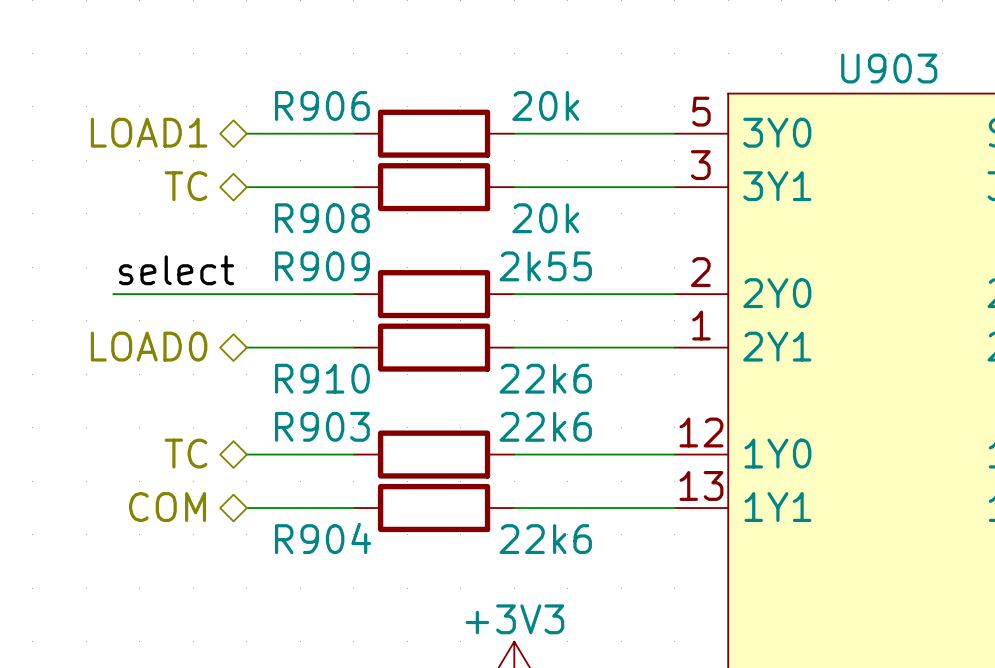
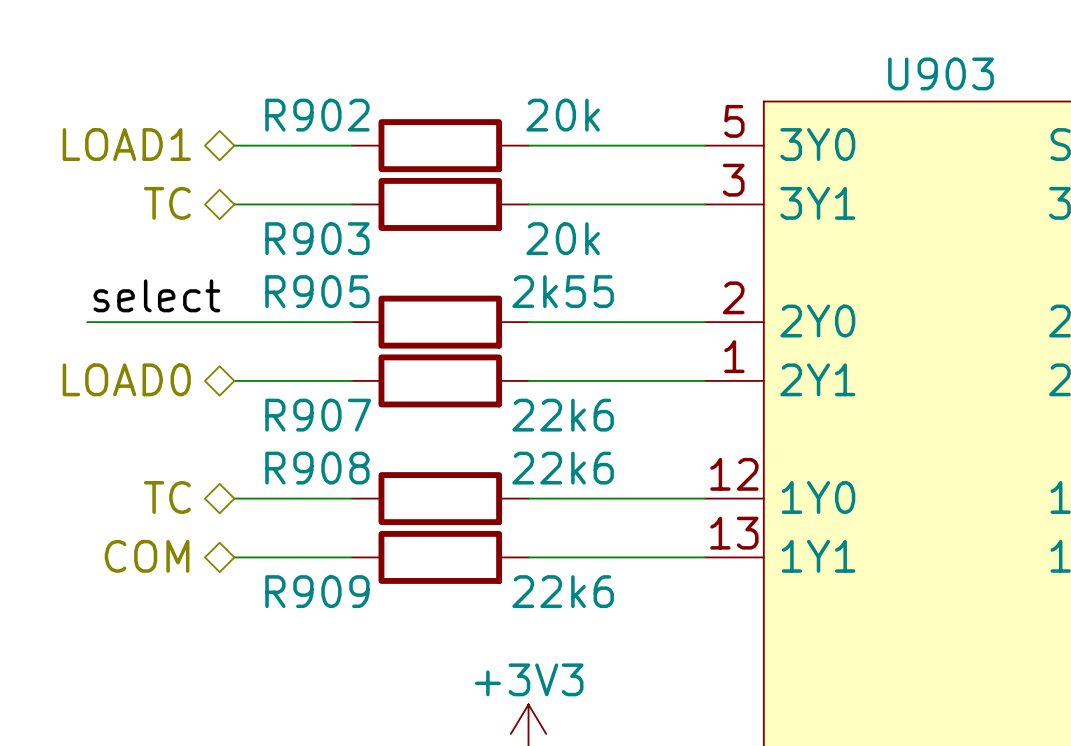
R906 name: R906 (322, 105) -> R902 (317, 115)
R908 name: R908 (322, 218) -> R903 (317, 238)
R909 name: R909 (322, 266) -> R905 (317, 291)
R910 name: R910 (322, 378) -> R907 (318, 415)
R903 name: R903 (322, 426) -> R908 (317, 468)
R904 name: R904 (323, 538) -> R909 (317, 591)

